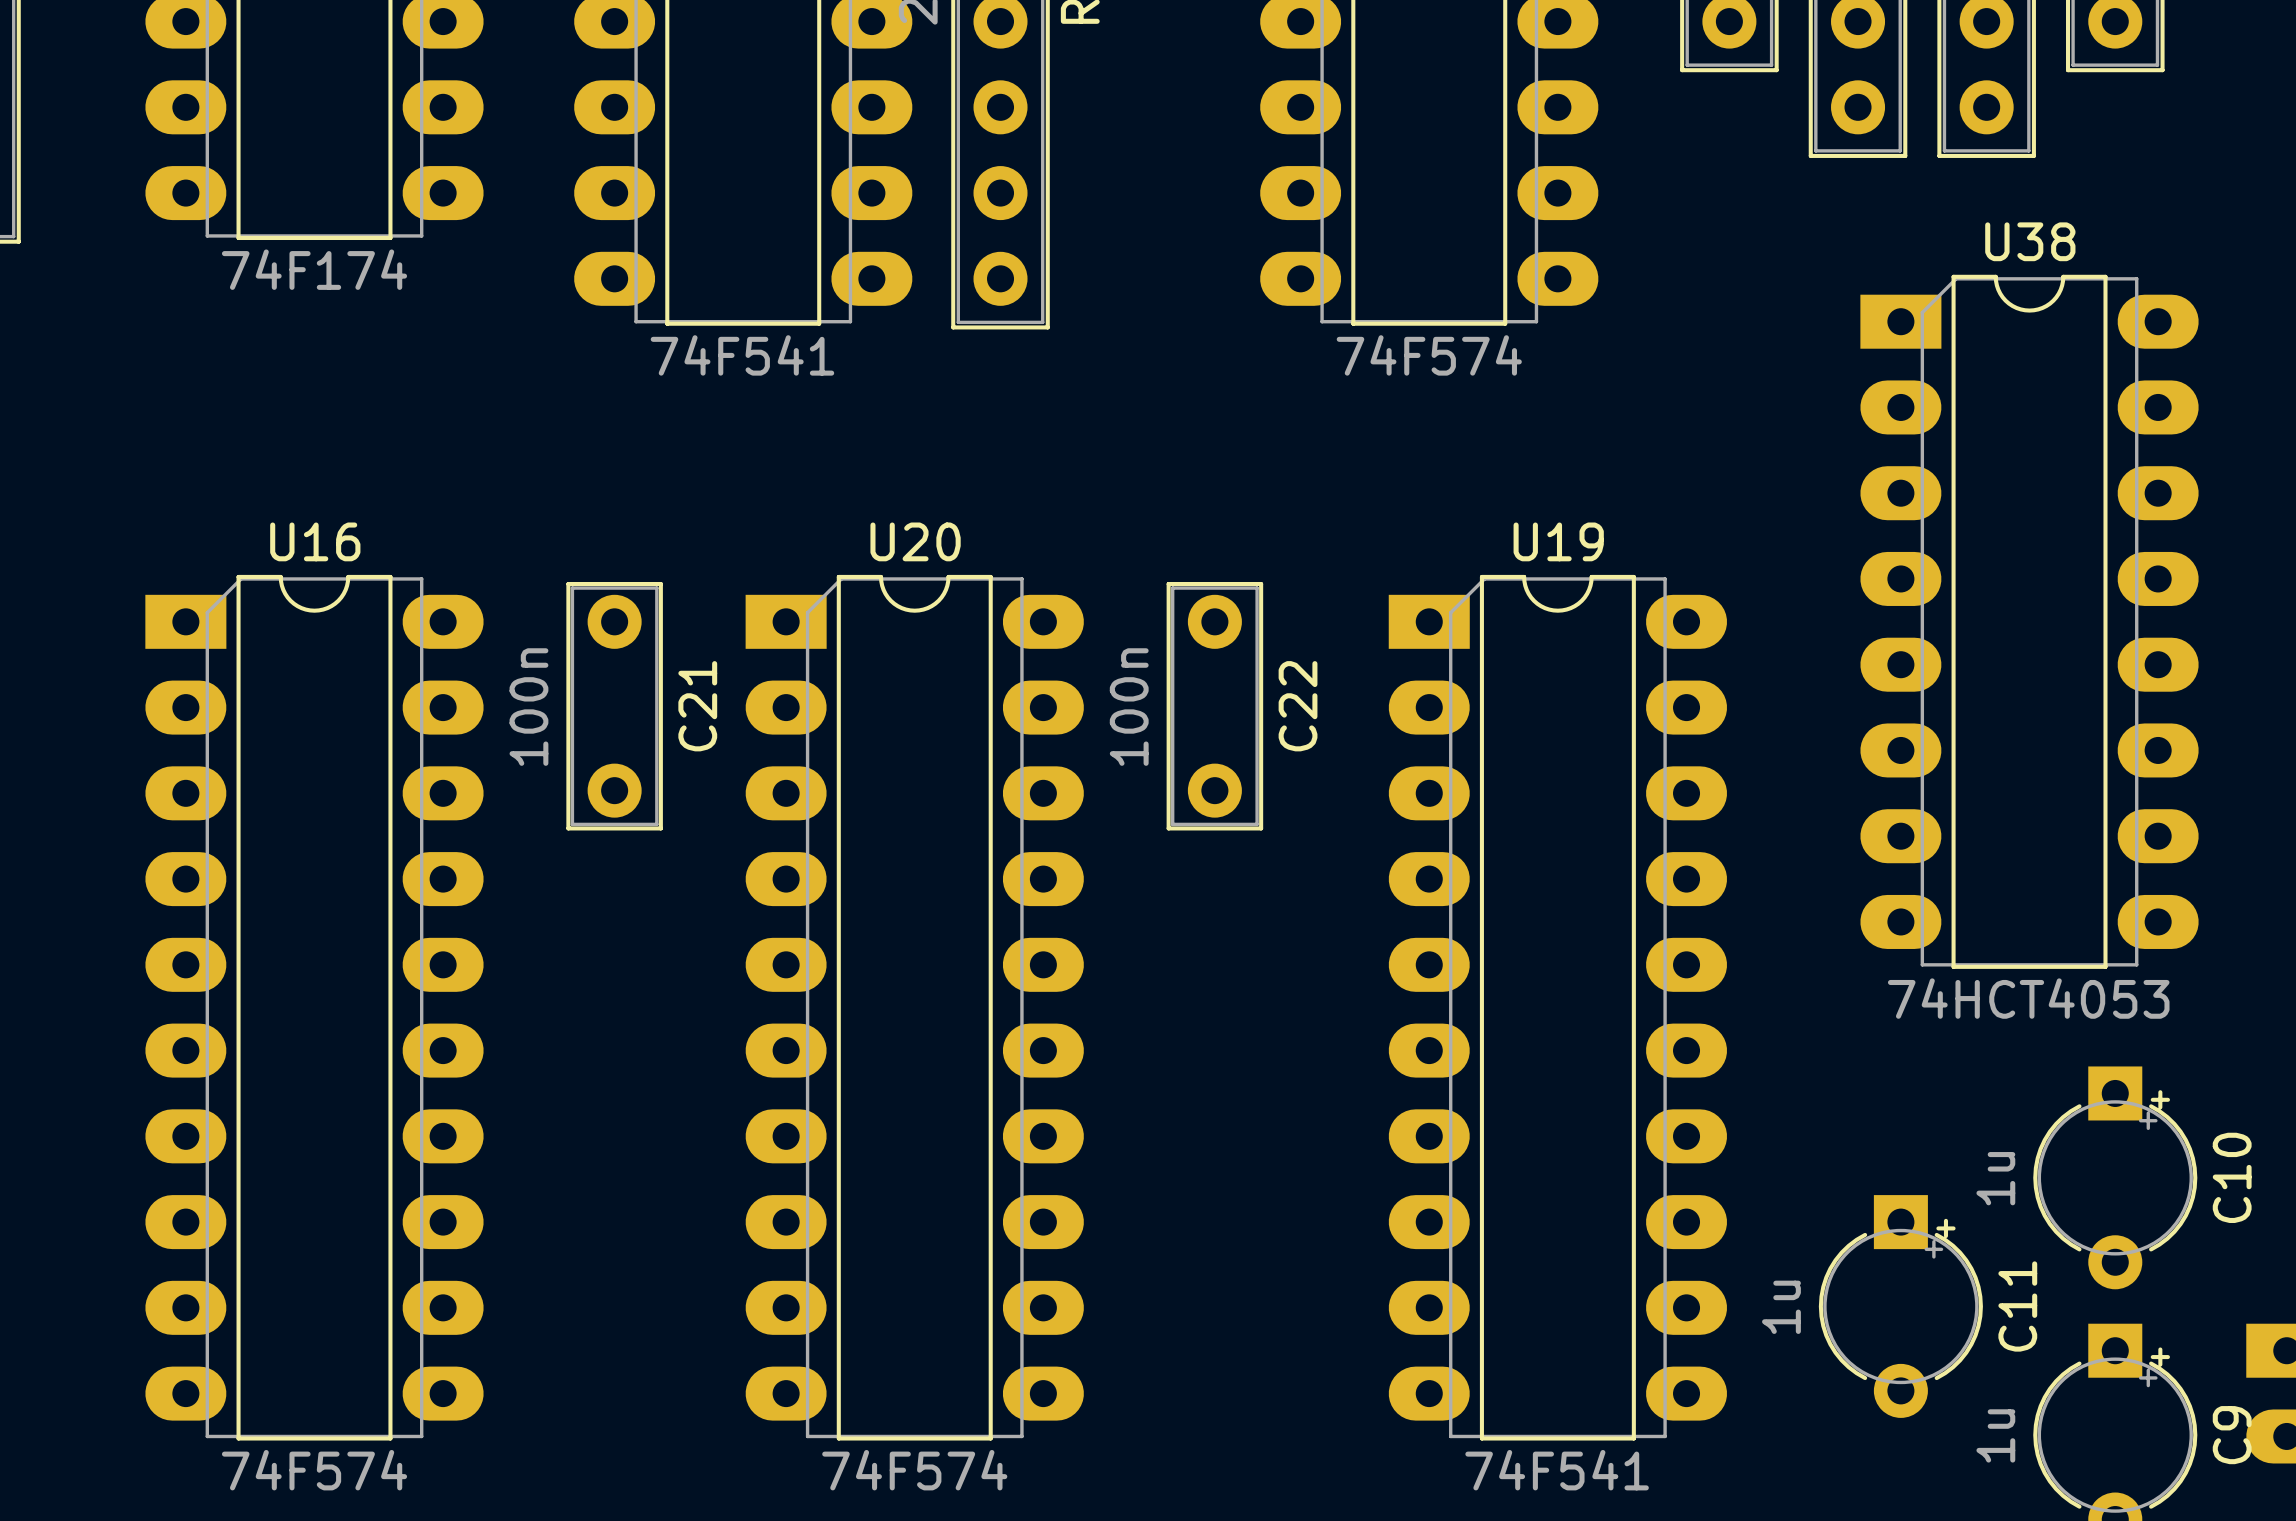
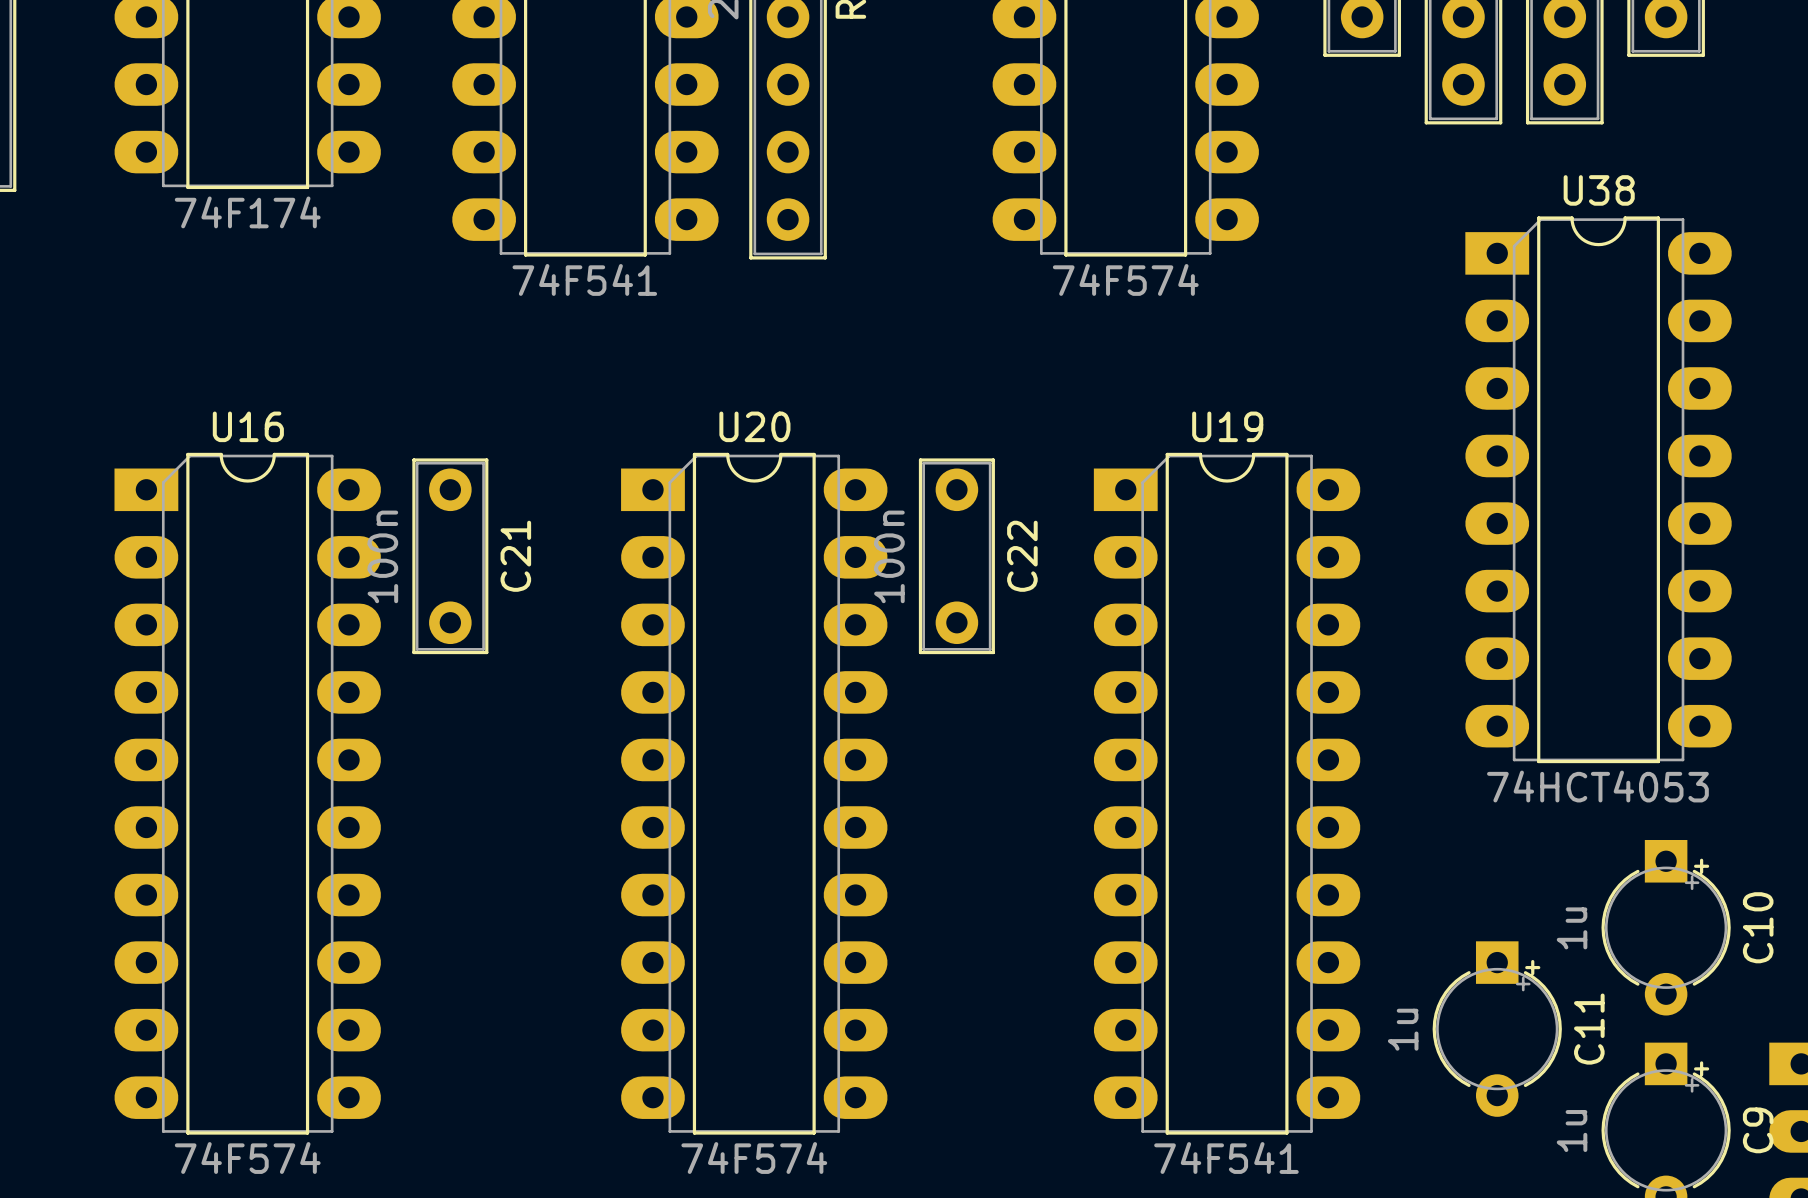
C21 position: (614, 706) -> (450, 556)
U20 position: (914, 1007) -> (754, 793)

